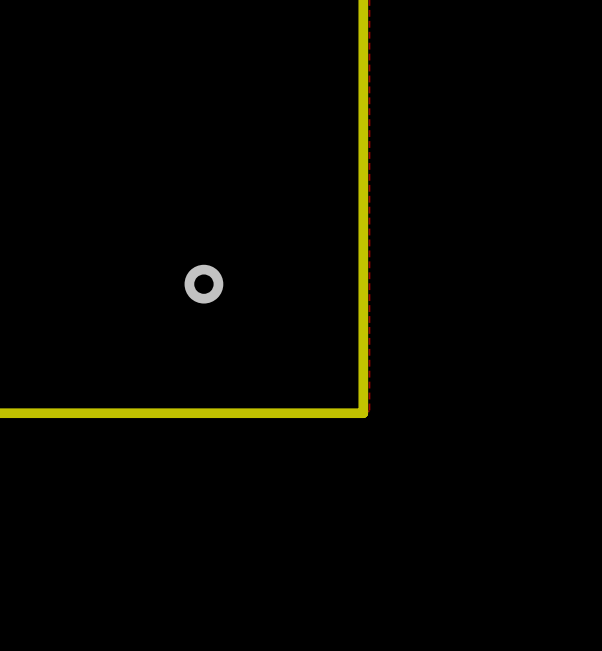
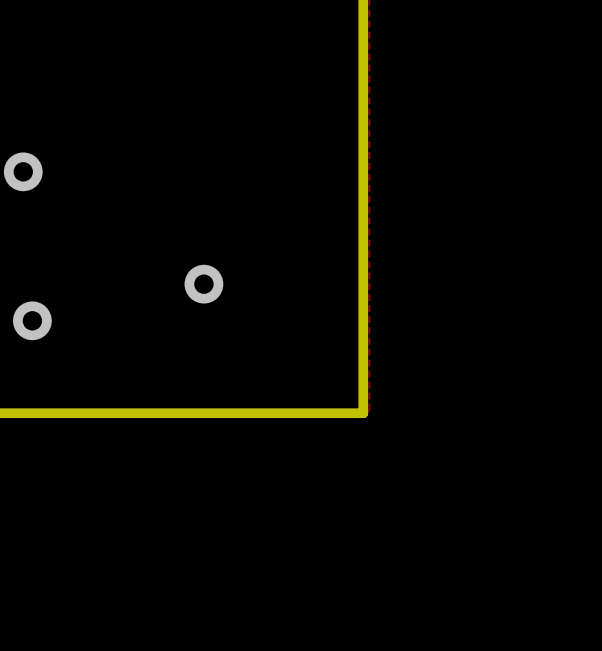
via: none -> (23, 171)
via: none -> (32, 320)

